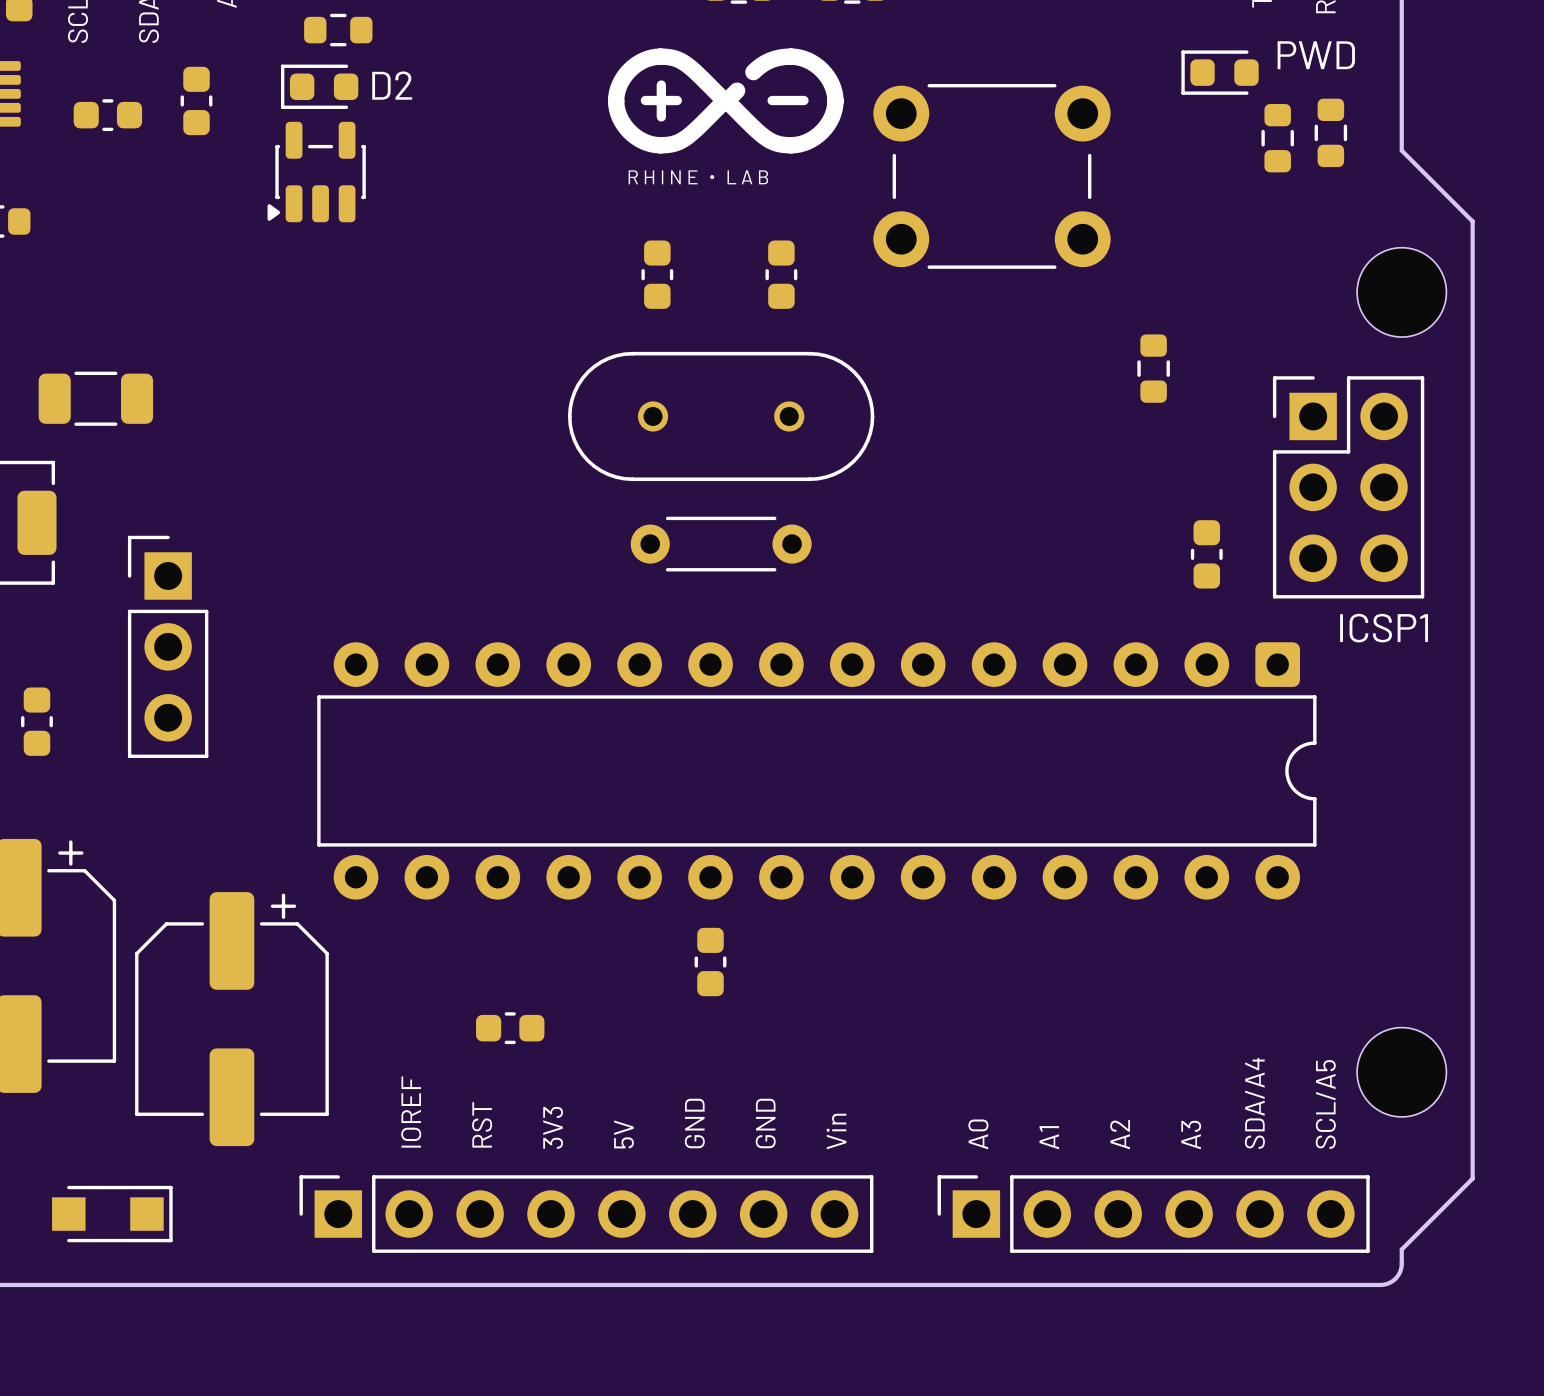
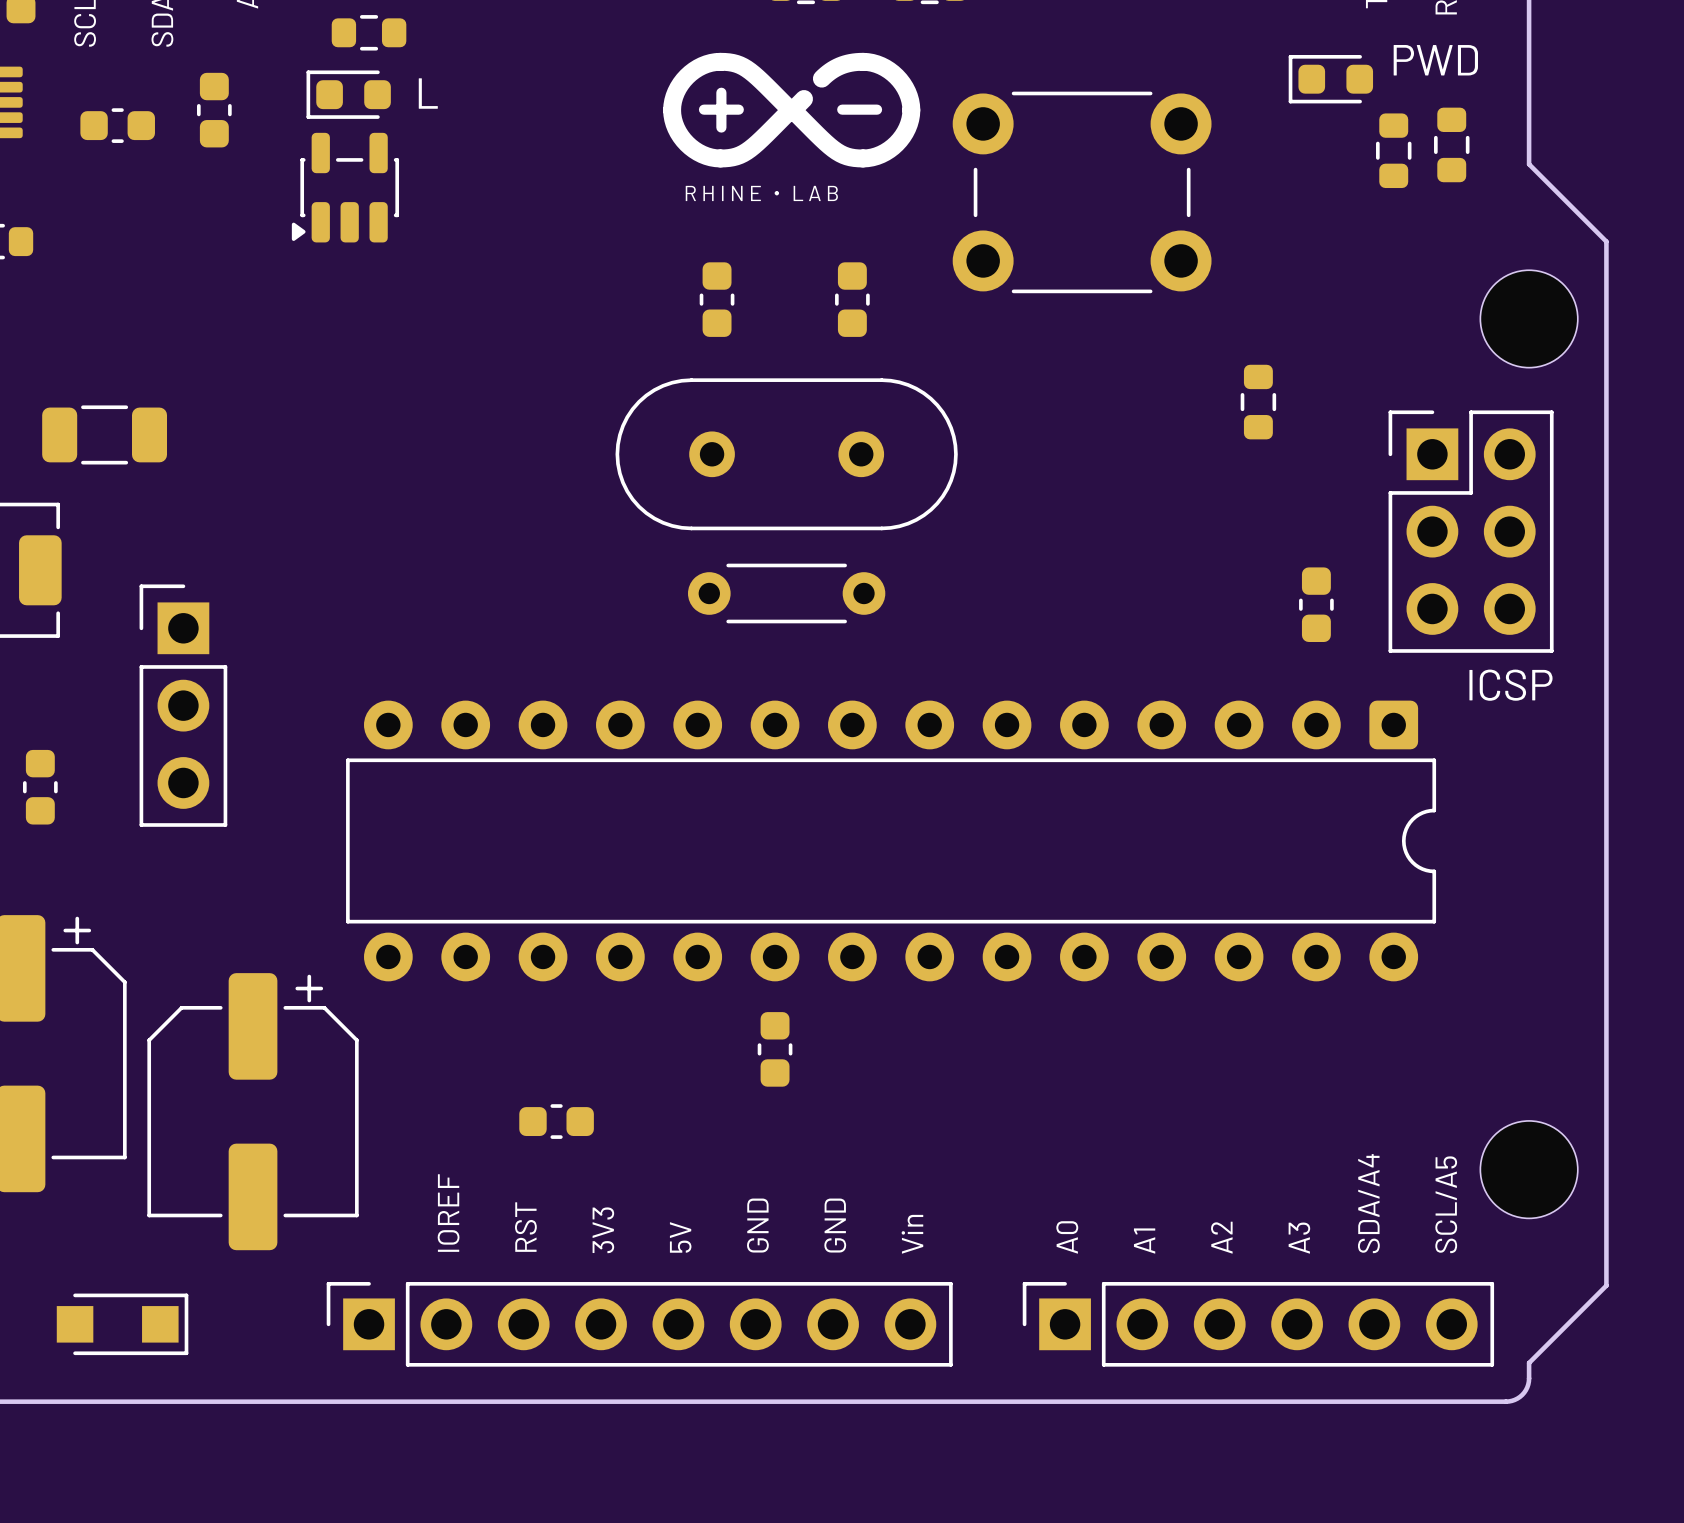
D2 name: D2 (392, 85) -> L (428, 93)
part footprint: [567, 351, 875, 482] -> [615, 378, 958, 531]
ICSP1 name: ICSP1 (1384, 628) -> ICSP (1510, 685)

